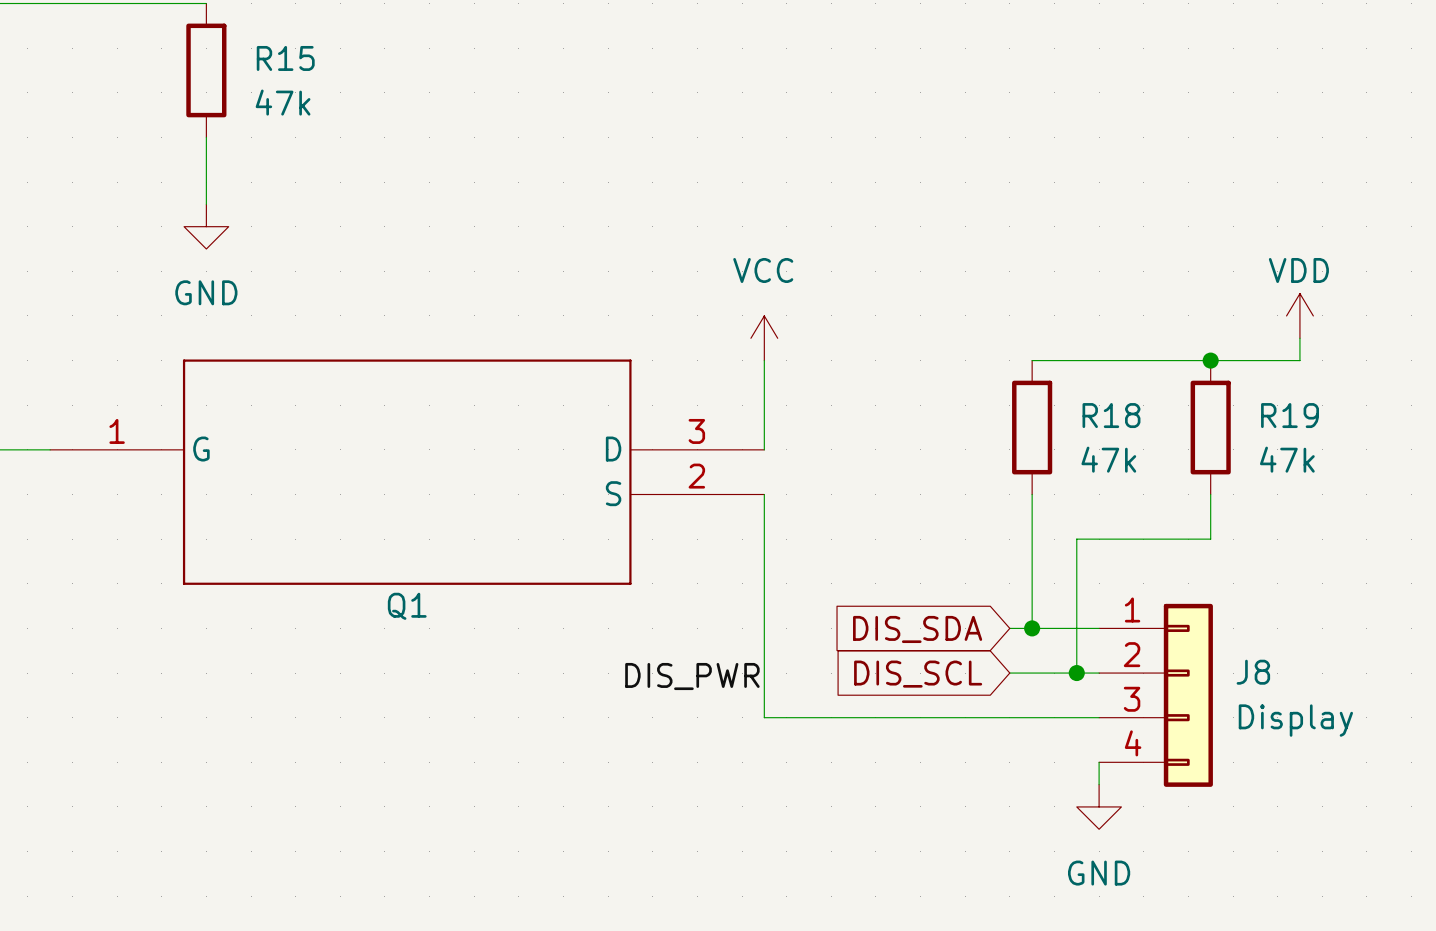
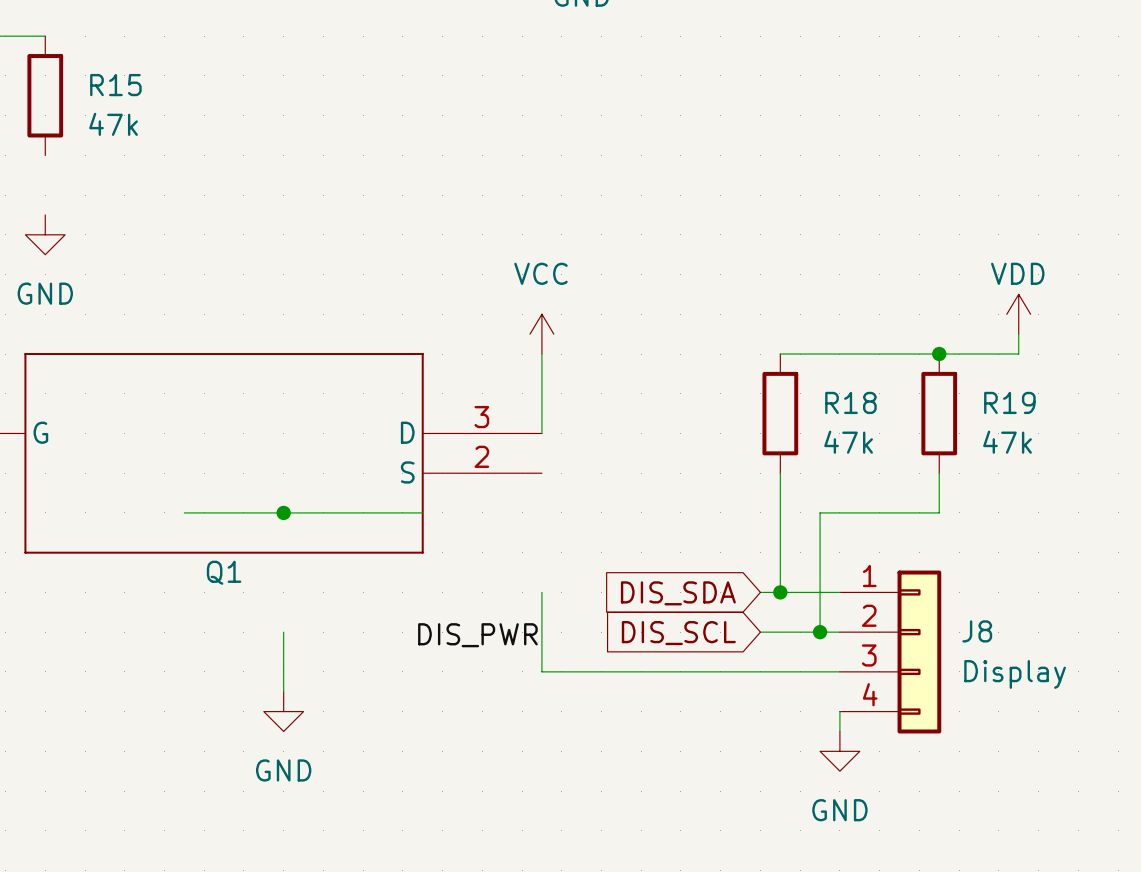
wire: (206, 137) (206, 204) -> none
wire: (764, 494) (764, 628) -> none
wire: none -> (184, 512) (422, 512)
junction: none -> (283, 512)
wire: none -> (283, 632) (283, 691)
power symbol: none -> GND (283, 711)

